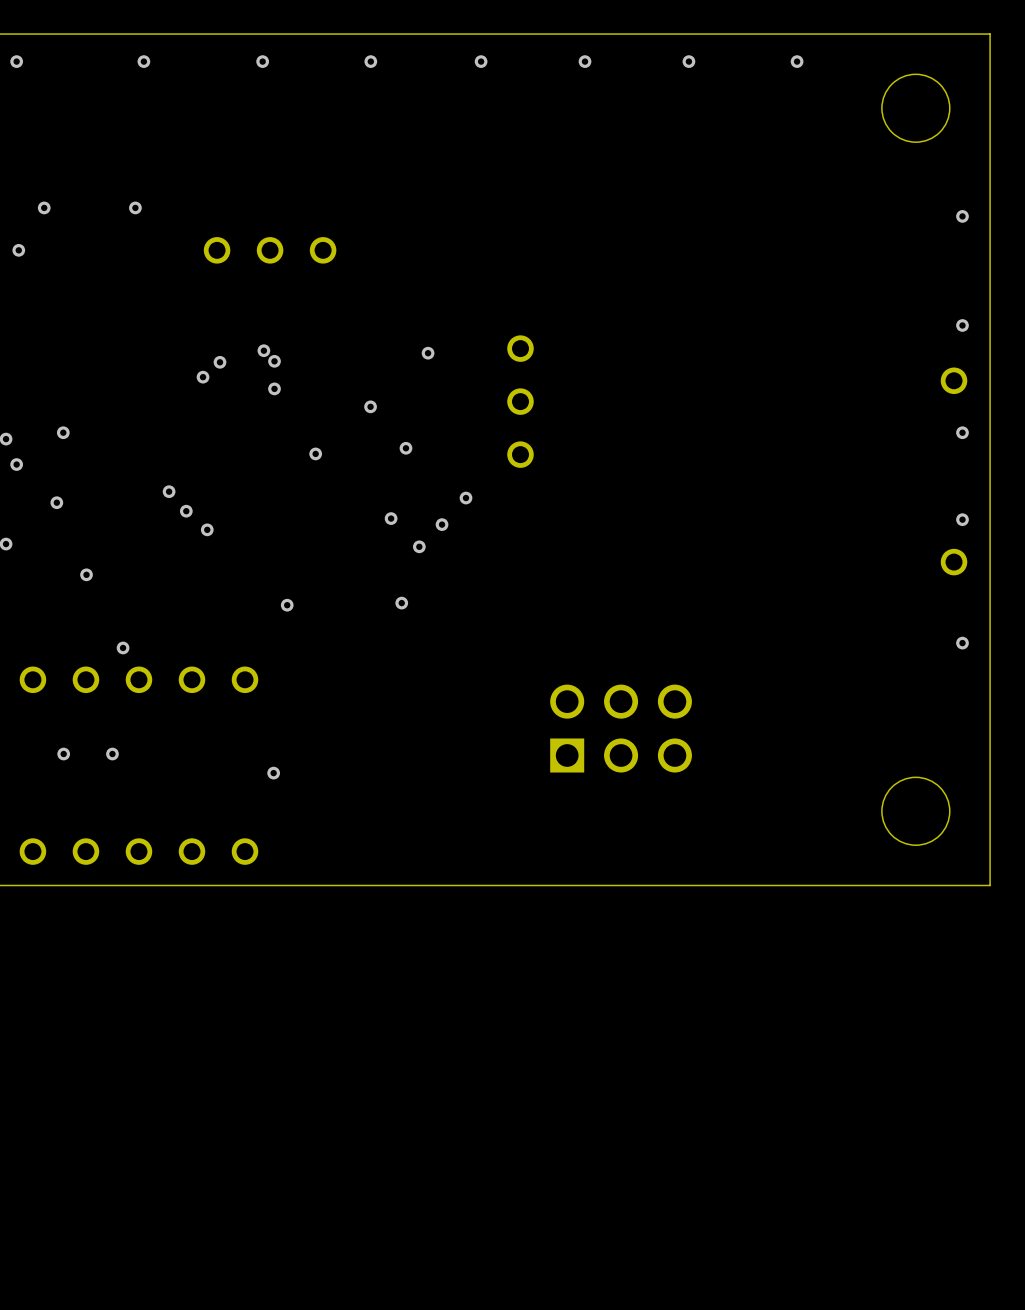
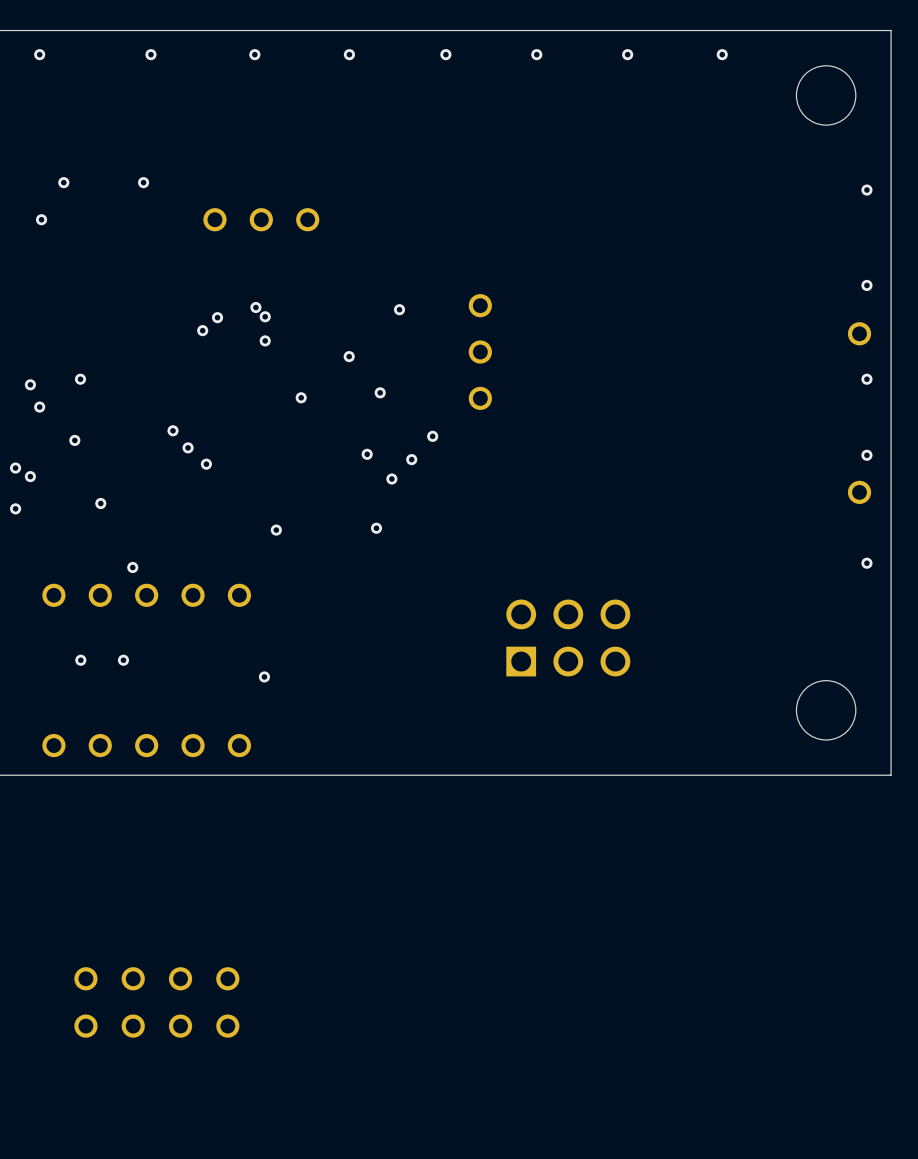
part: none -> (85, 978)
part: none -> (133, 978)
part: none -> (180, 978)
part: none -> (227, 978)
part: none -> (85, 1026)
part: none -> (133, 1026)
part: none -> (180, 1026)
part: none -> (227, 1026)

